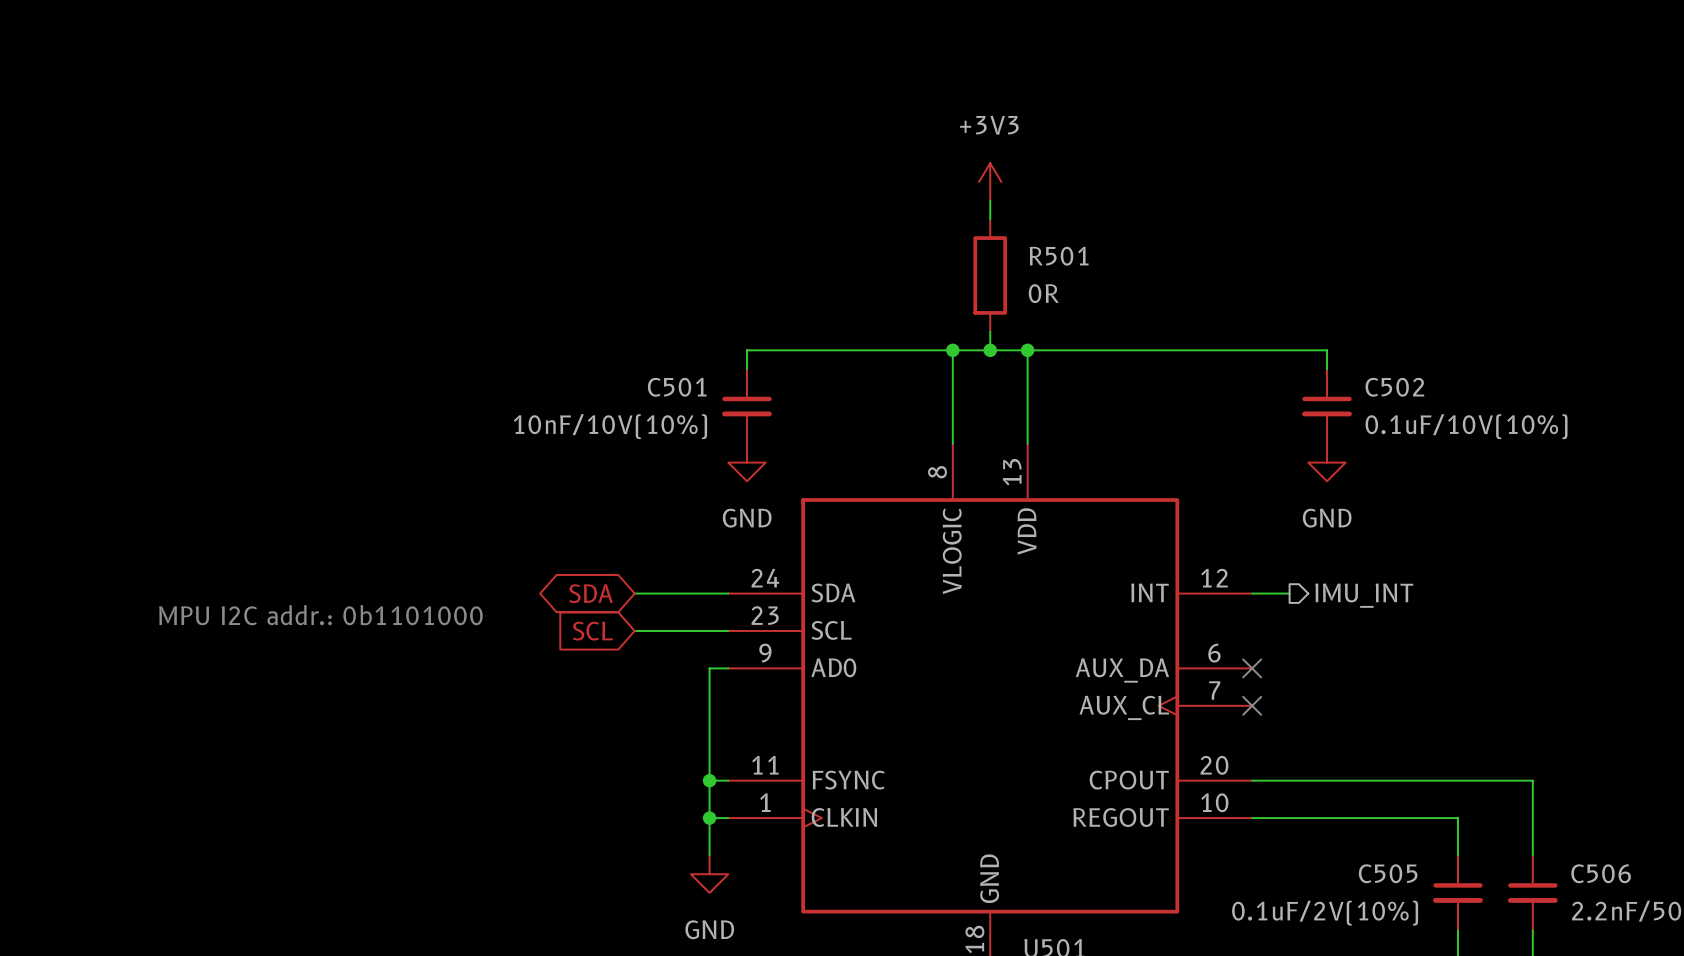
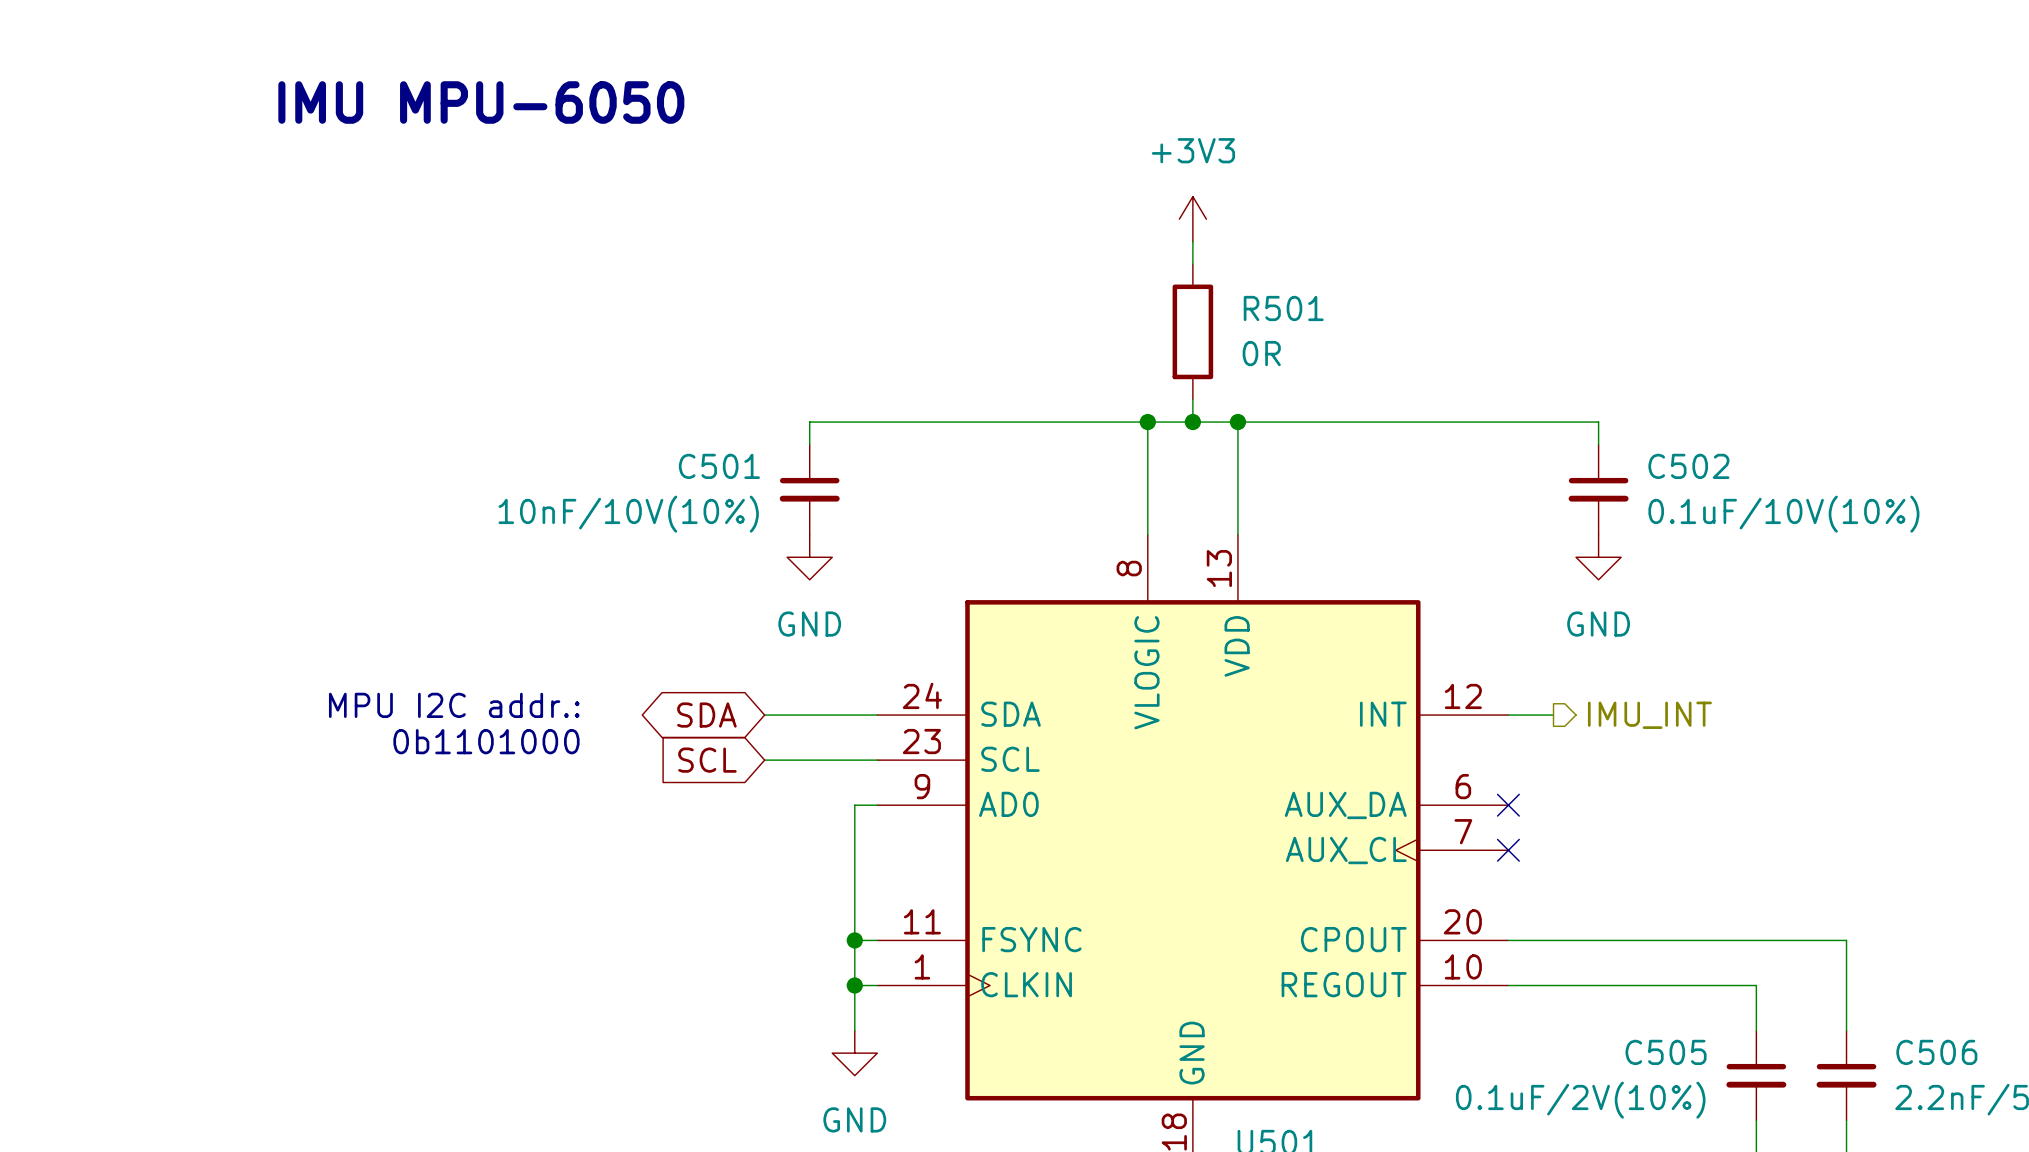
text: none -> IMU MPU-6050 (481, 102)
wire: (746, 350) (746, 369) -> (899, 422) (809, 422) (809, 444)
C501 position: (746, 406) -> (809, 489)
power symbol position: GND (746, 462) -> GND (809, 557)
text: none -> MPU I2C addr.: (454, 705)
text: MPU I2C addr.: 0b1101000 (320, 615) -> 0b1101000 (486, 741)

